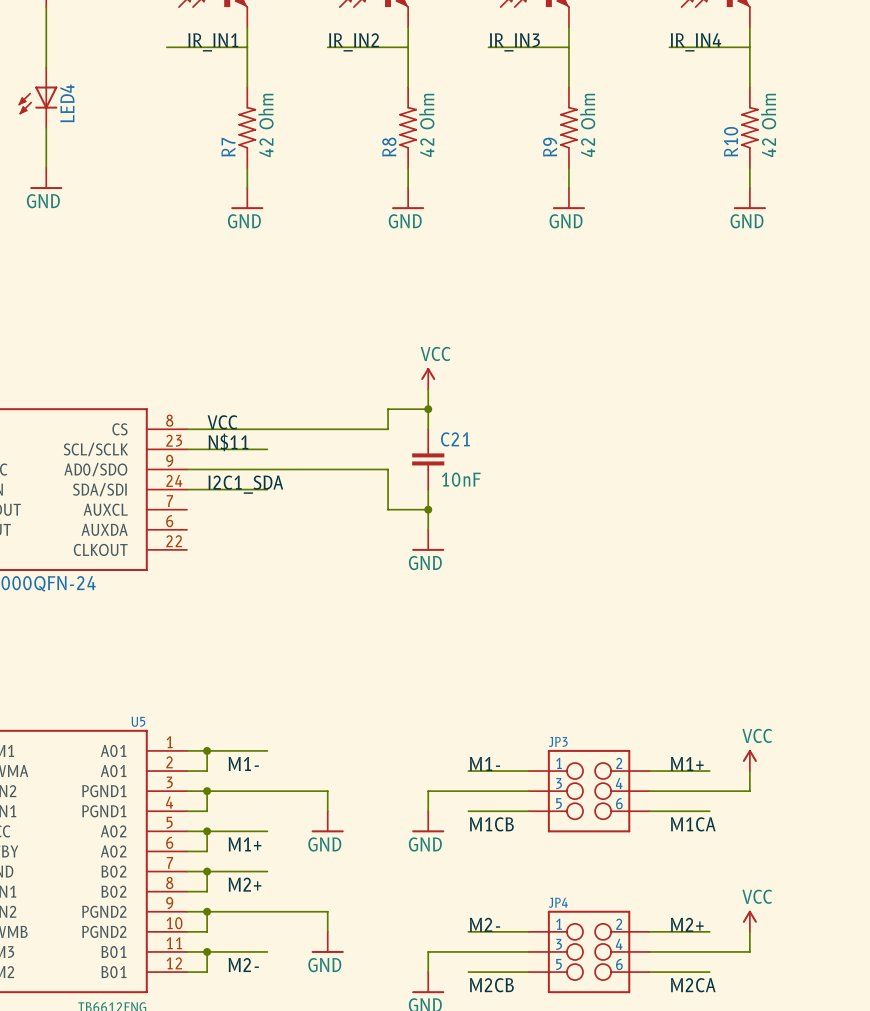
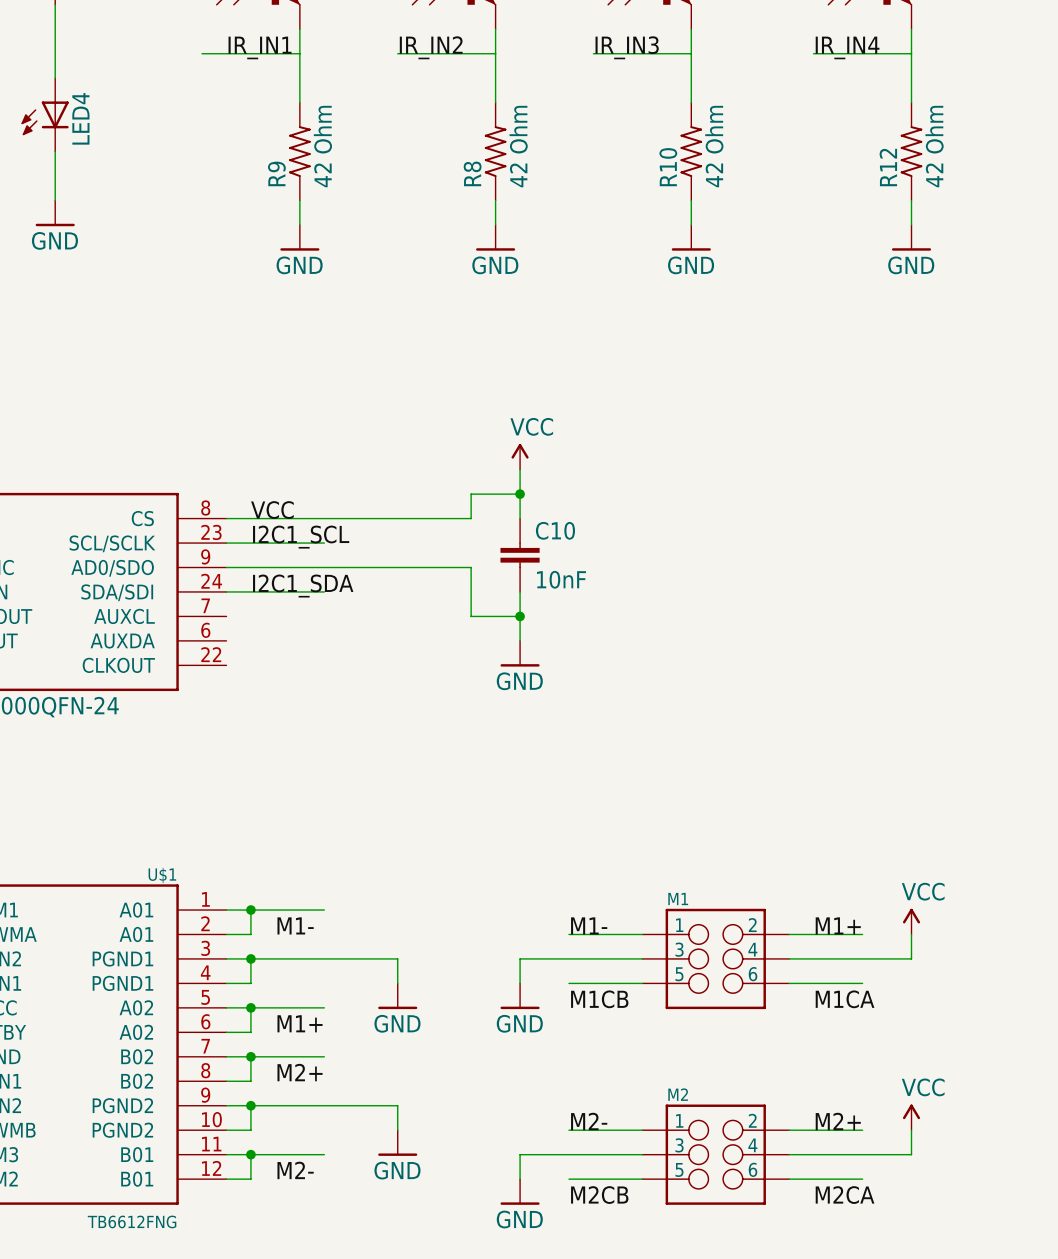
R10 name: R10 (731, 141) -> R12 (888, 167)
R7 name: R7 (228, 147) -> R9 (276, 173)
R9 name: R9 (550, 147) -> R10 (668, 167)
C21 name: C21 (455, 439) -> C10 (555, 530)
label: N$11 (228, 442) -> I2C1_SCL (301, 537)
U5 name: U5 (138, 721) -> U$1 (162, 875)
JP3 name: JP3 (558, 741) -> M1 (678, 899)
JP4 name: JP4 (558, 902) -> M2 (678, 1094)

